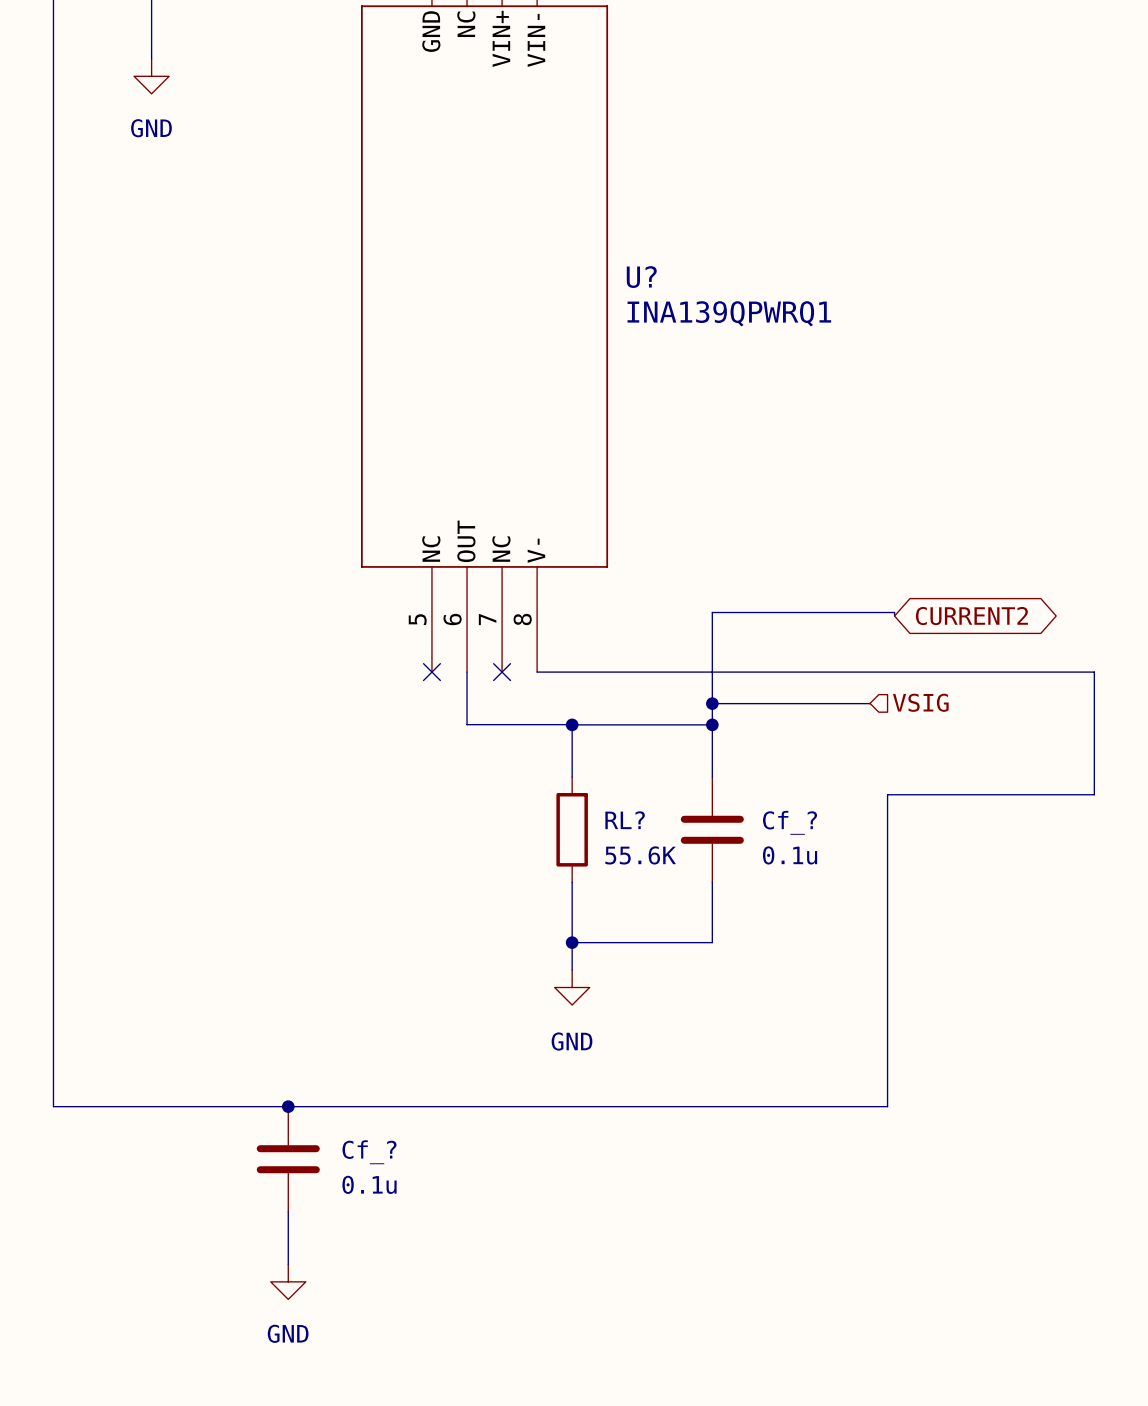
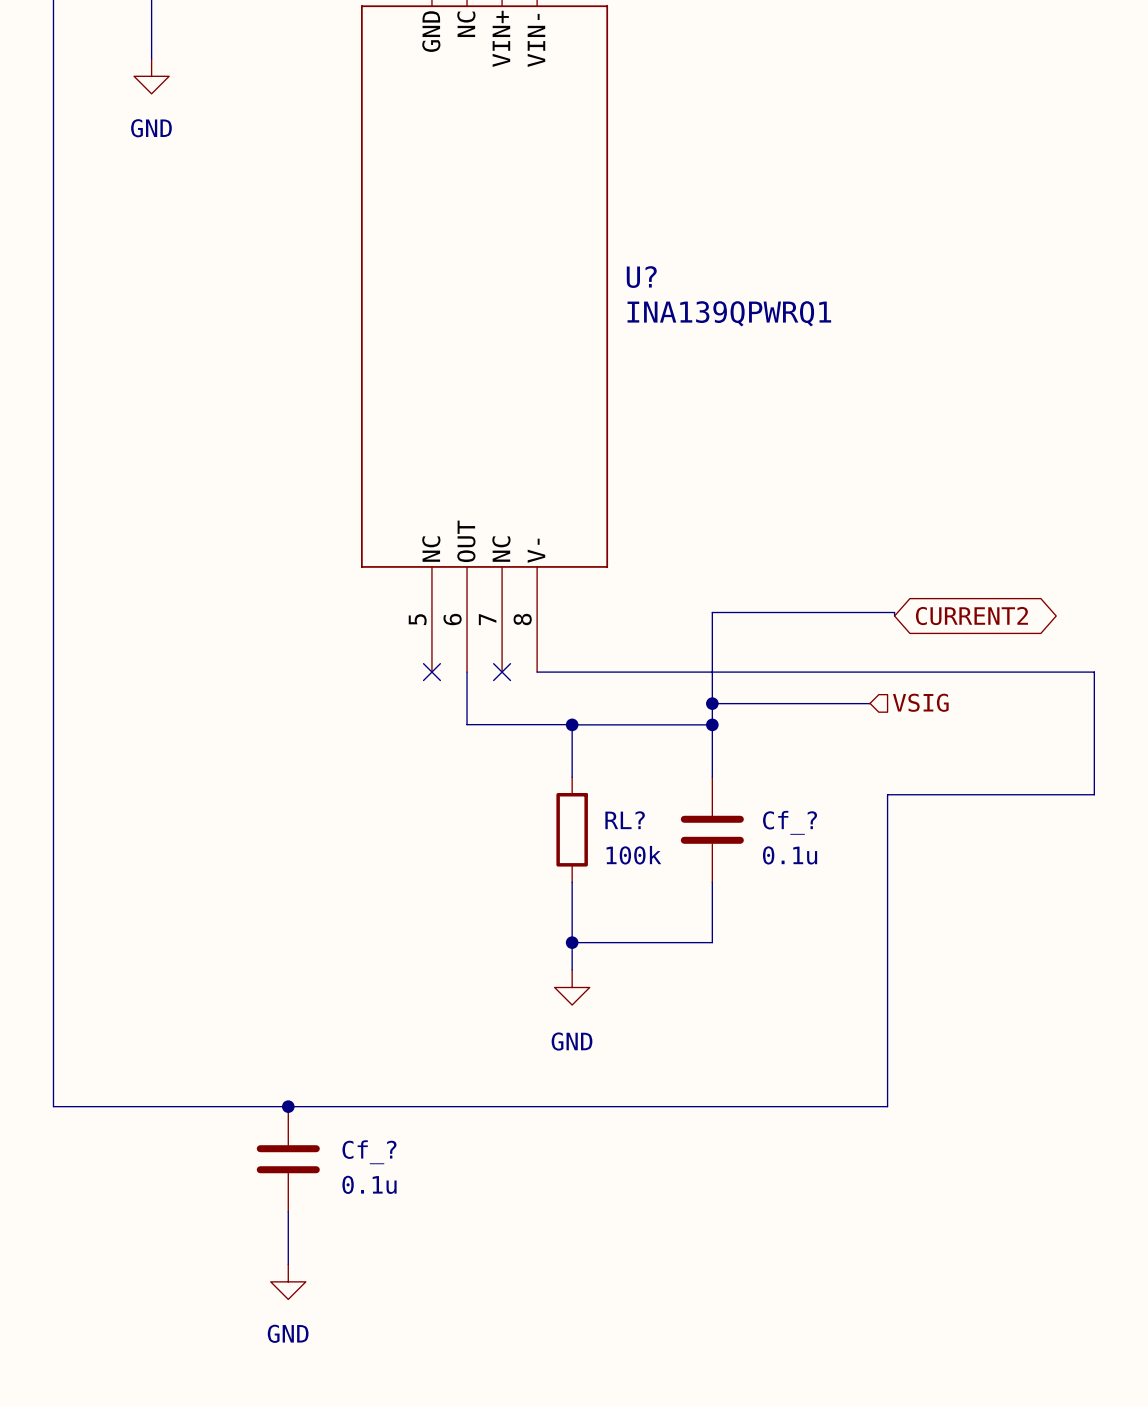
RL? value: 55.6K (640, 855) -> 100k (633, 855)

